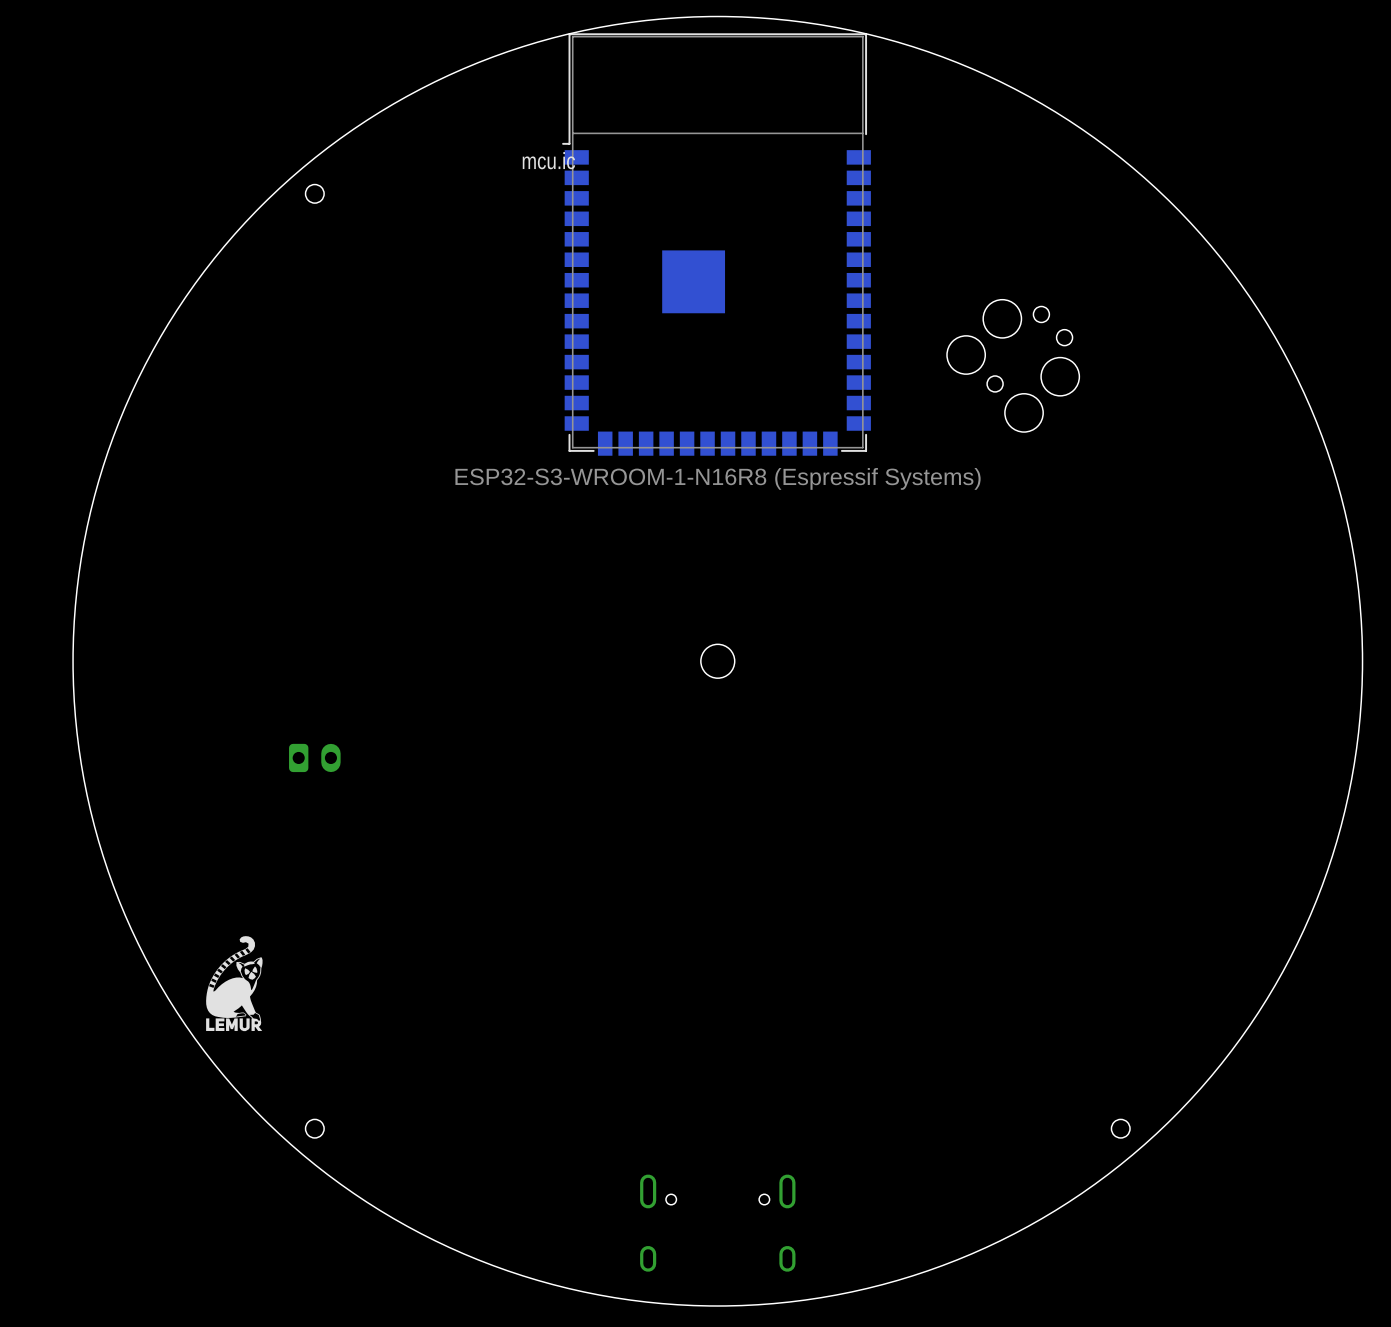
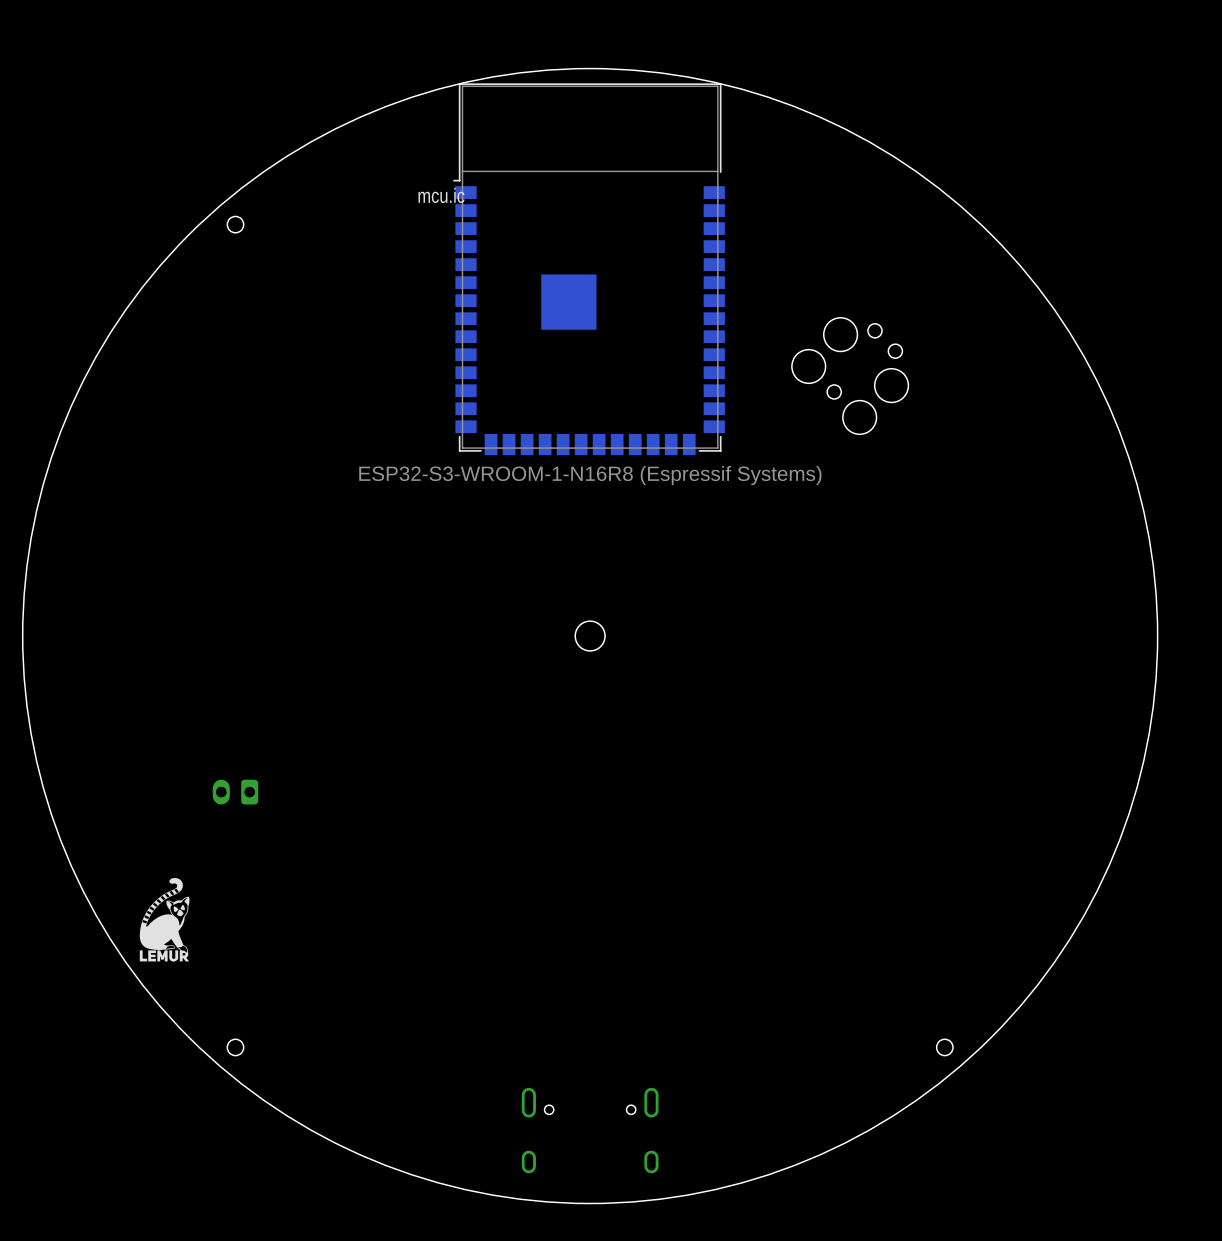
part rotation: 0° (314, 757) -> 180° (235, 792)
part position: (314, 757) -> (235, 792)

